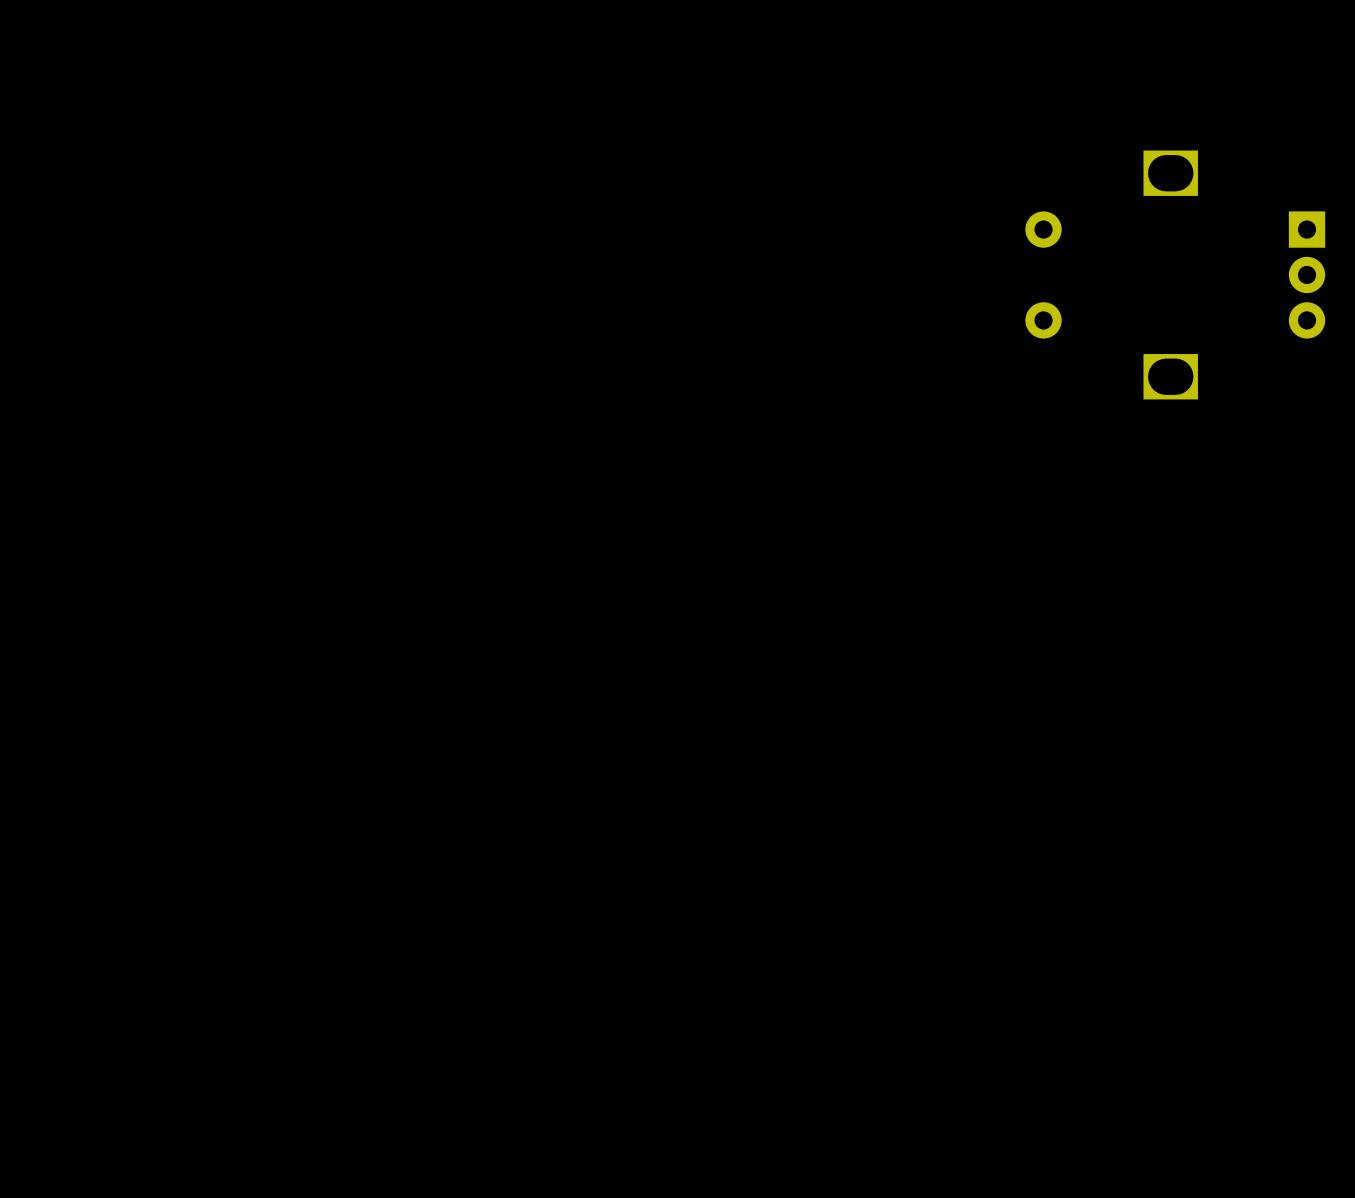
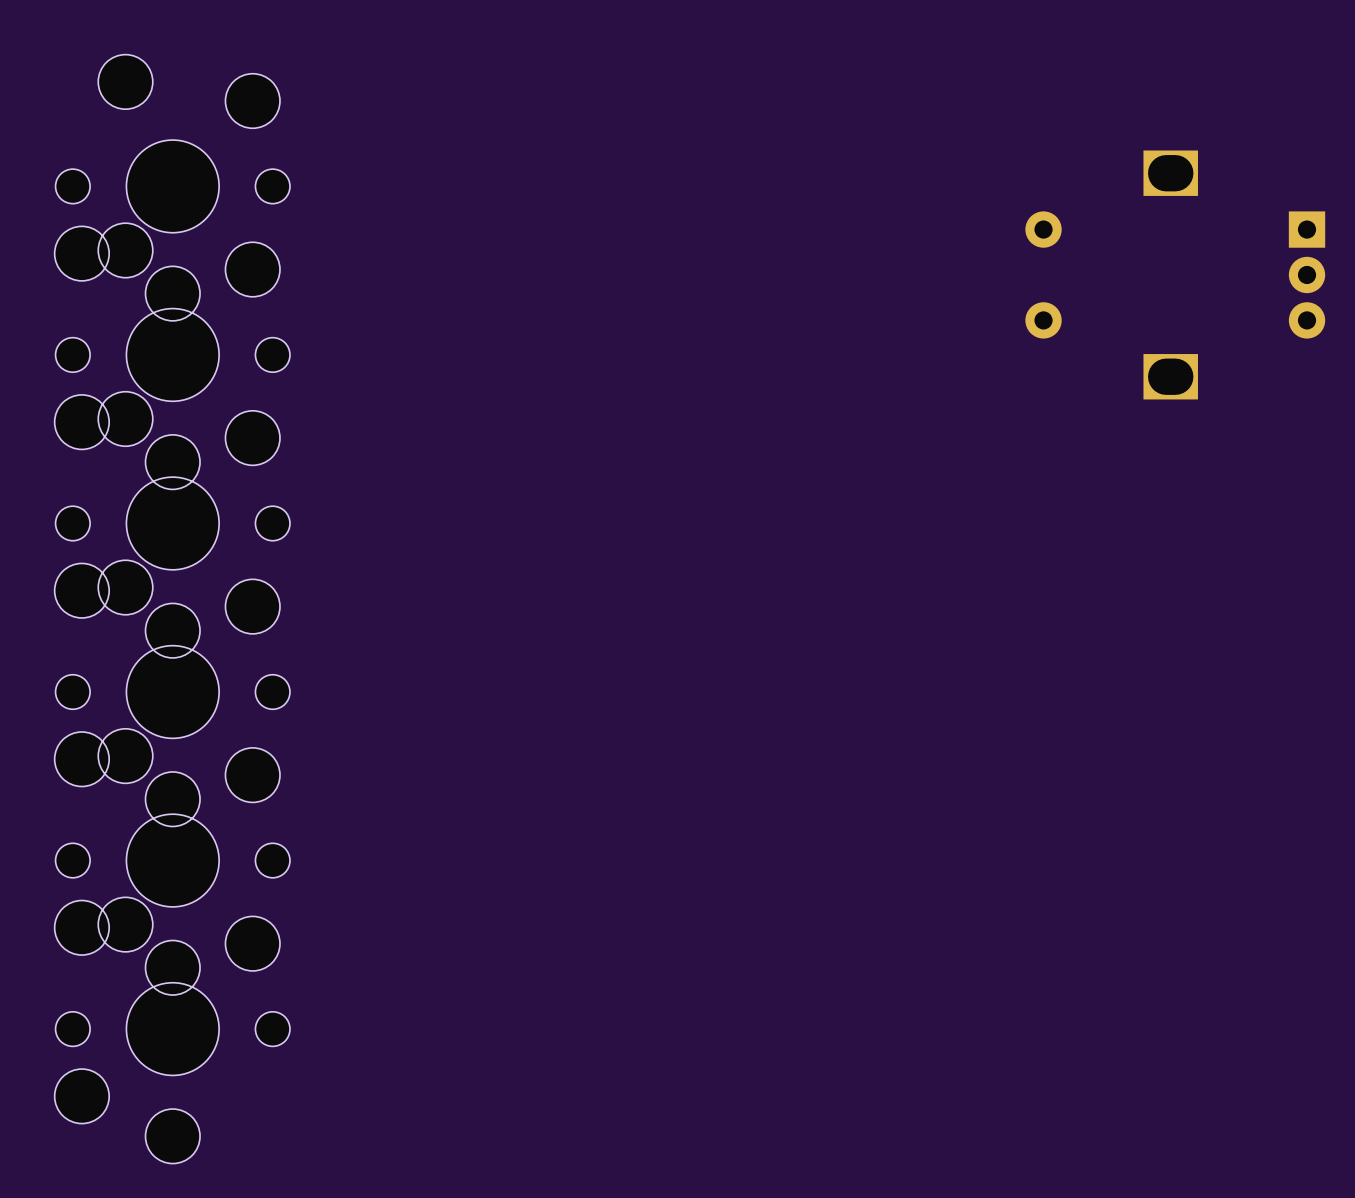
part: none -> (172, 187)
part: none -> (172, 356)
part: none -> (172, 524)
part: none -> (172, 693)
part: none -> (172, 861)
part: none -> (172, 1030)

